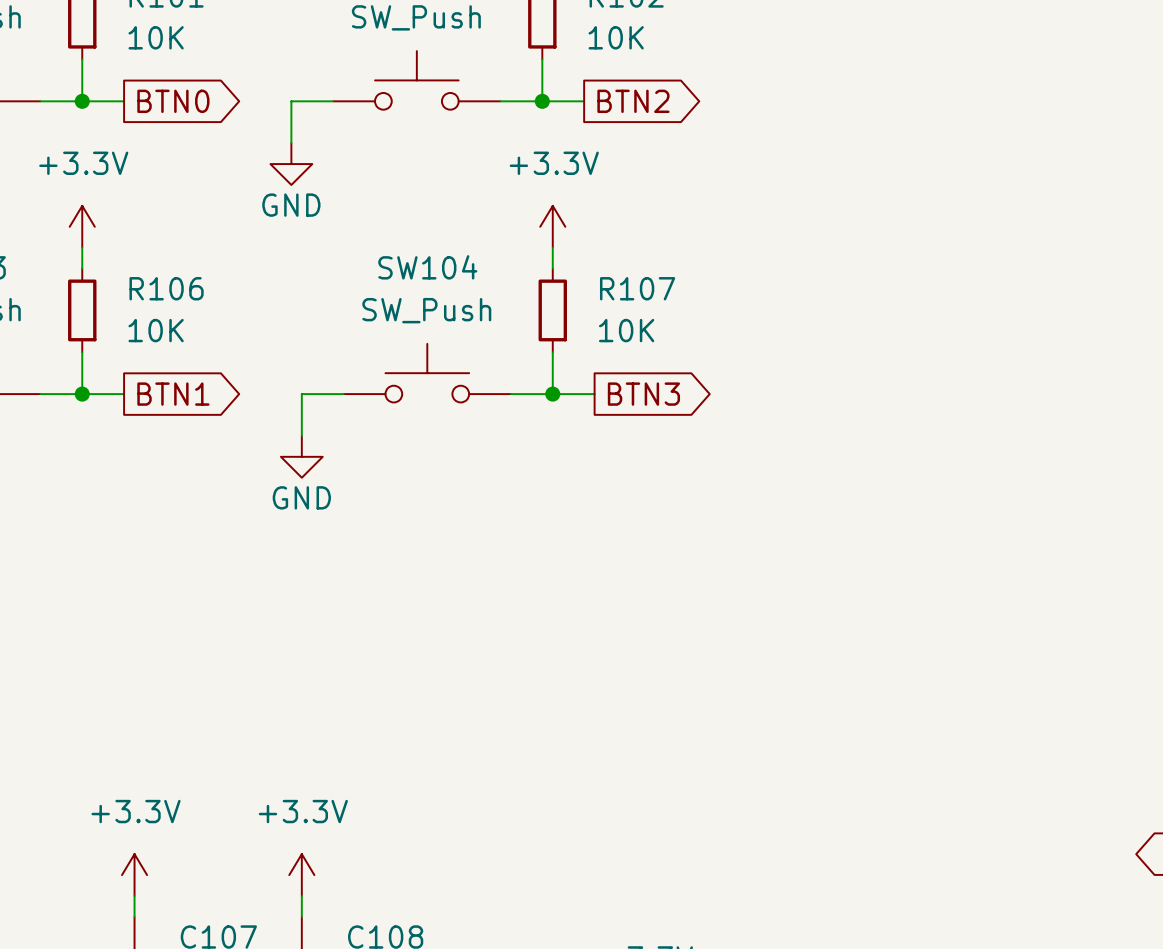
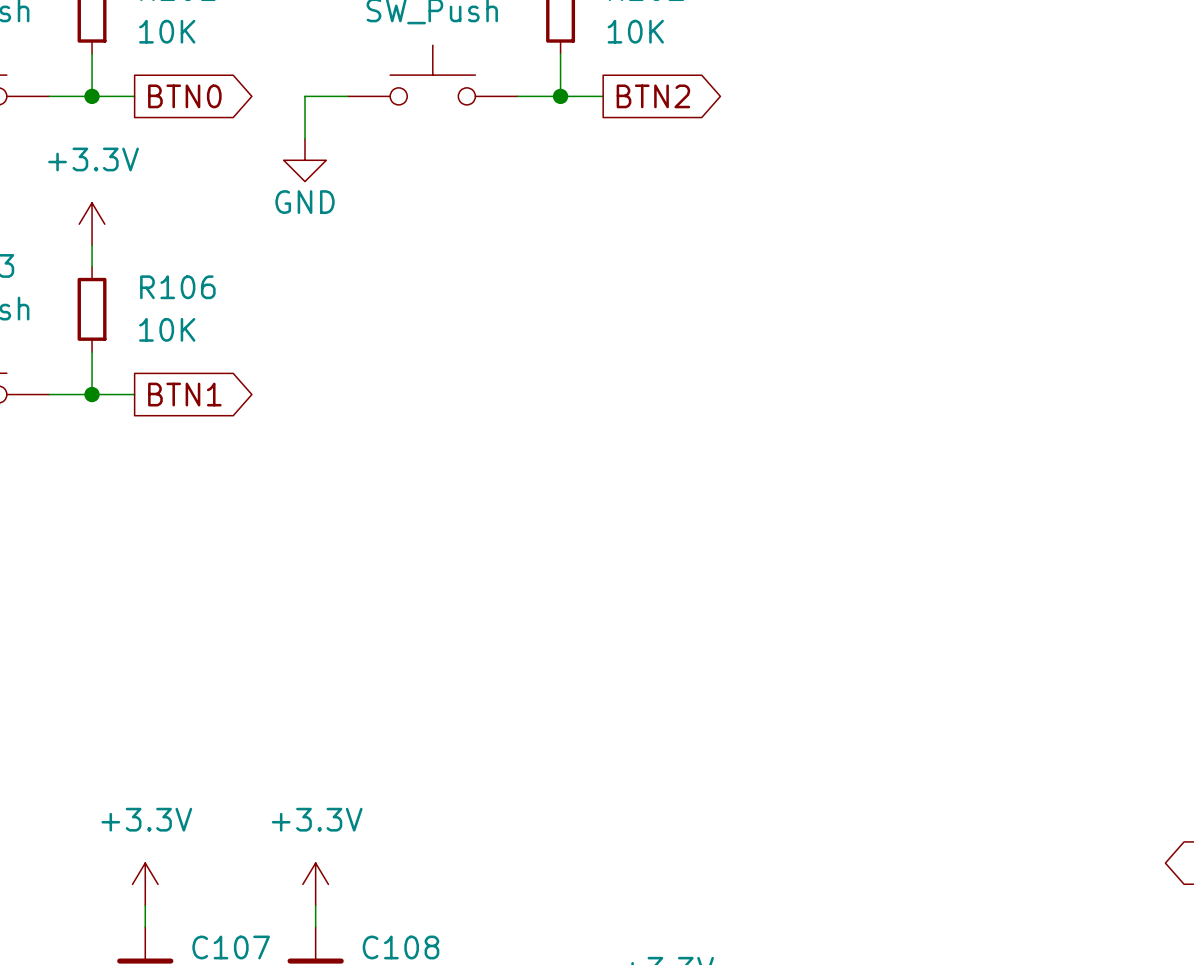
power symbol: +3.3V (552, 226) -> none
wire: (552, 247) (552, 268) -> none
R107: 10K (552, 310) -> none
wire: (552, 352) (552, 394) -> none
SW104: SW_Push (427, 373) -> none
wire: (343, 394) (301, 394) (301, 435) -> none
wire: (510, 394) (594, 394) -> none
junction: (552, 394) -> none
global label: BTN3 (643, 394) -> none
power symbol: GND (301, 456) -> none

